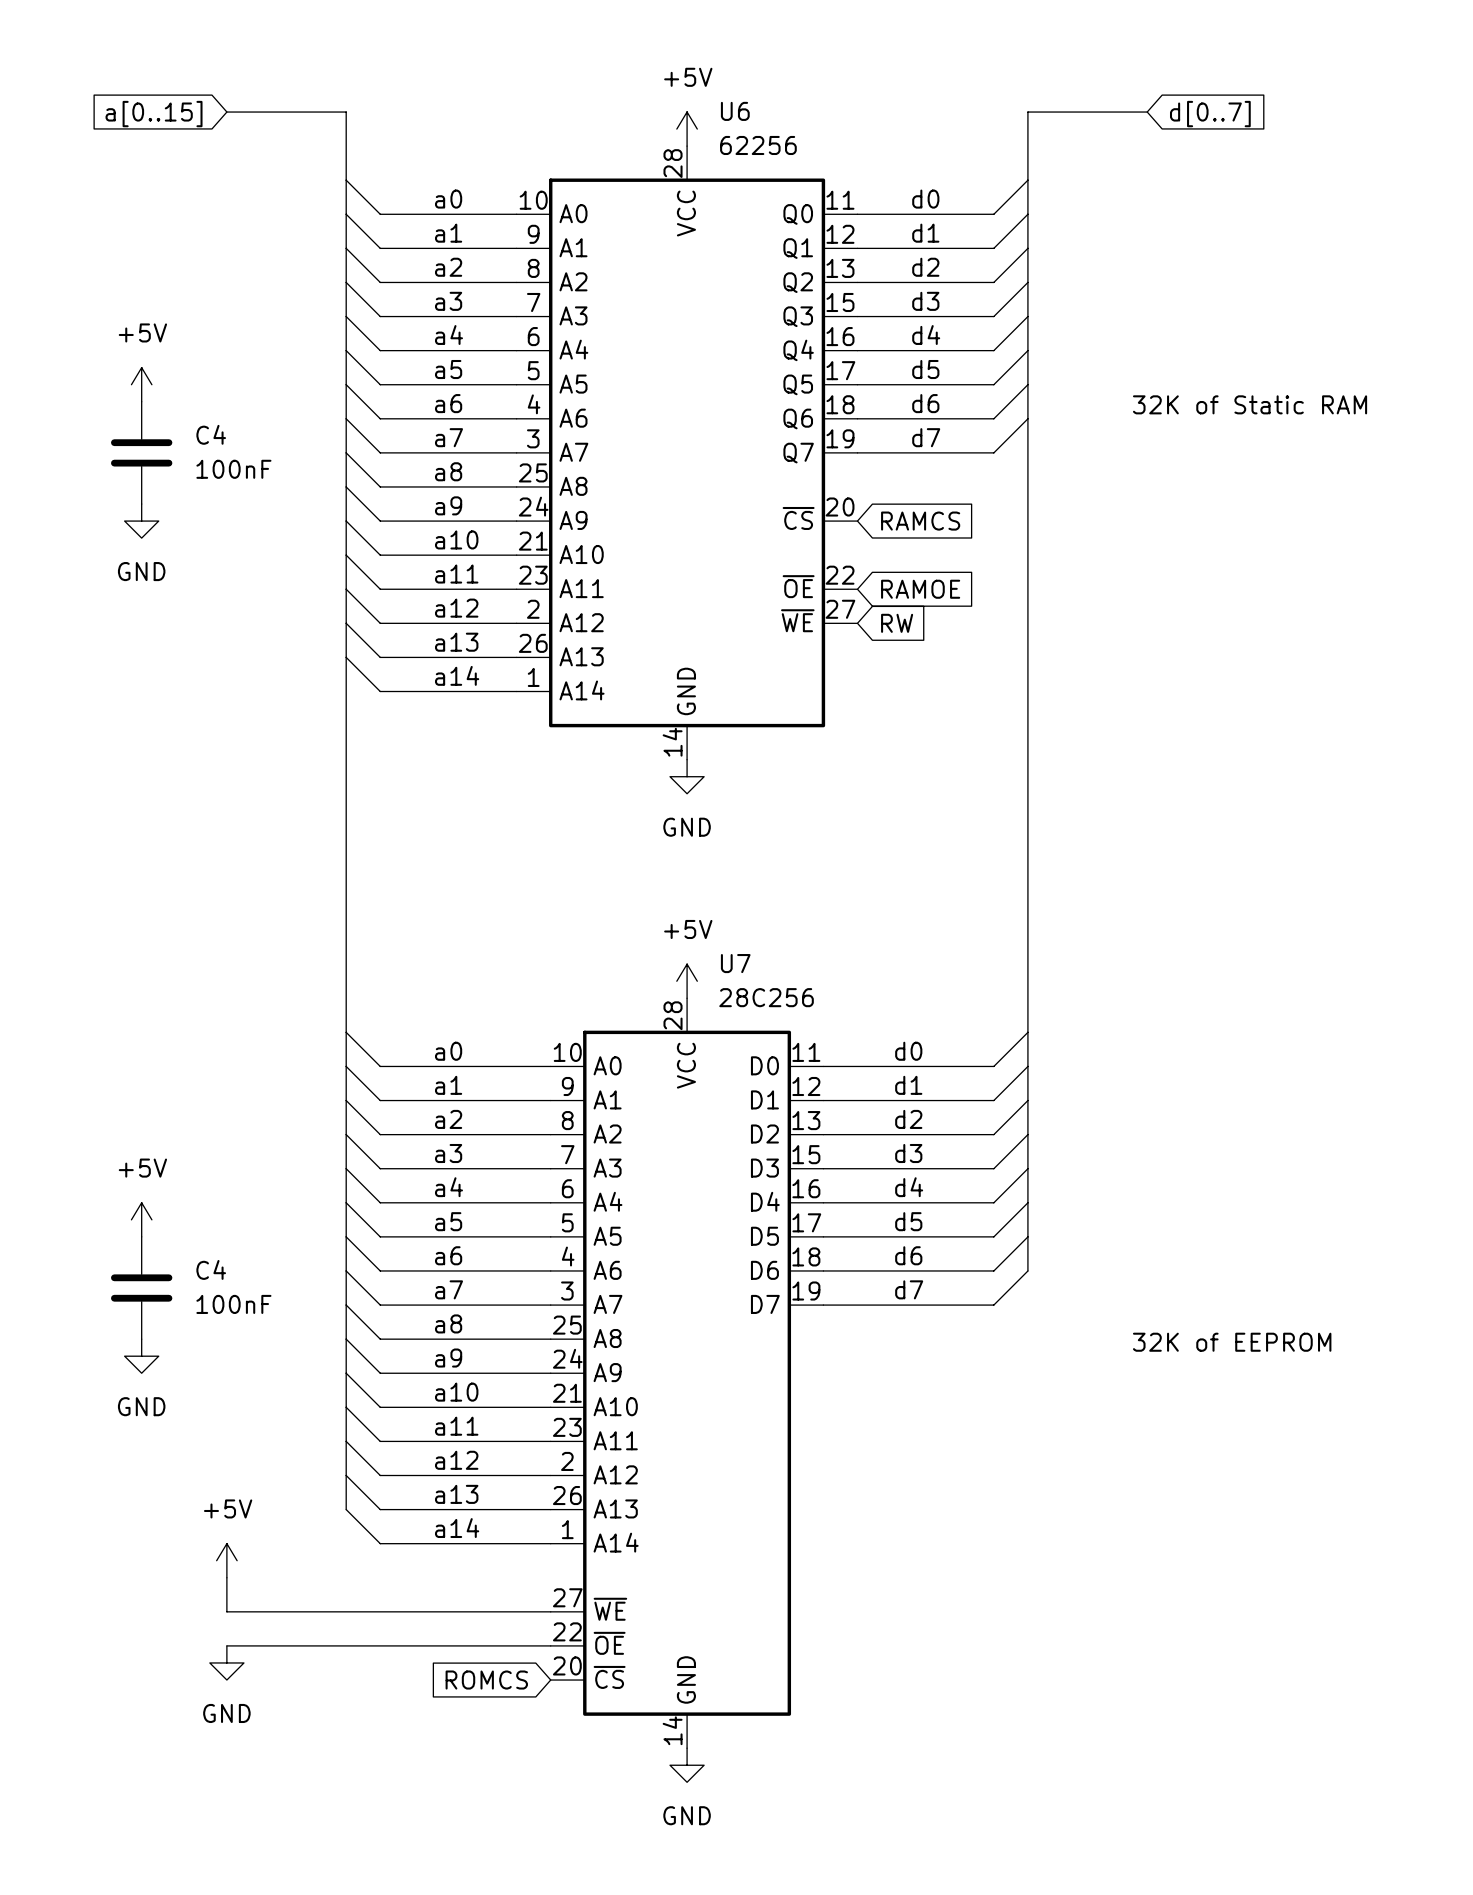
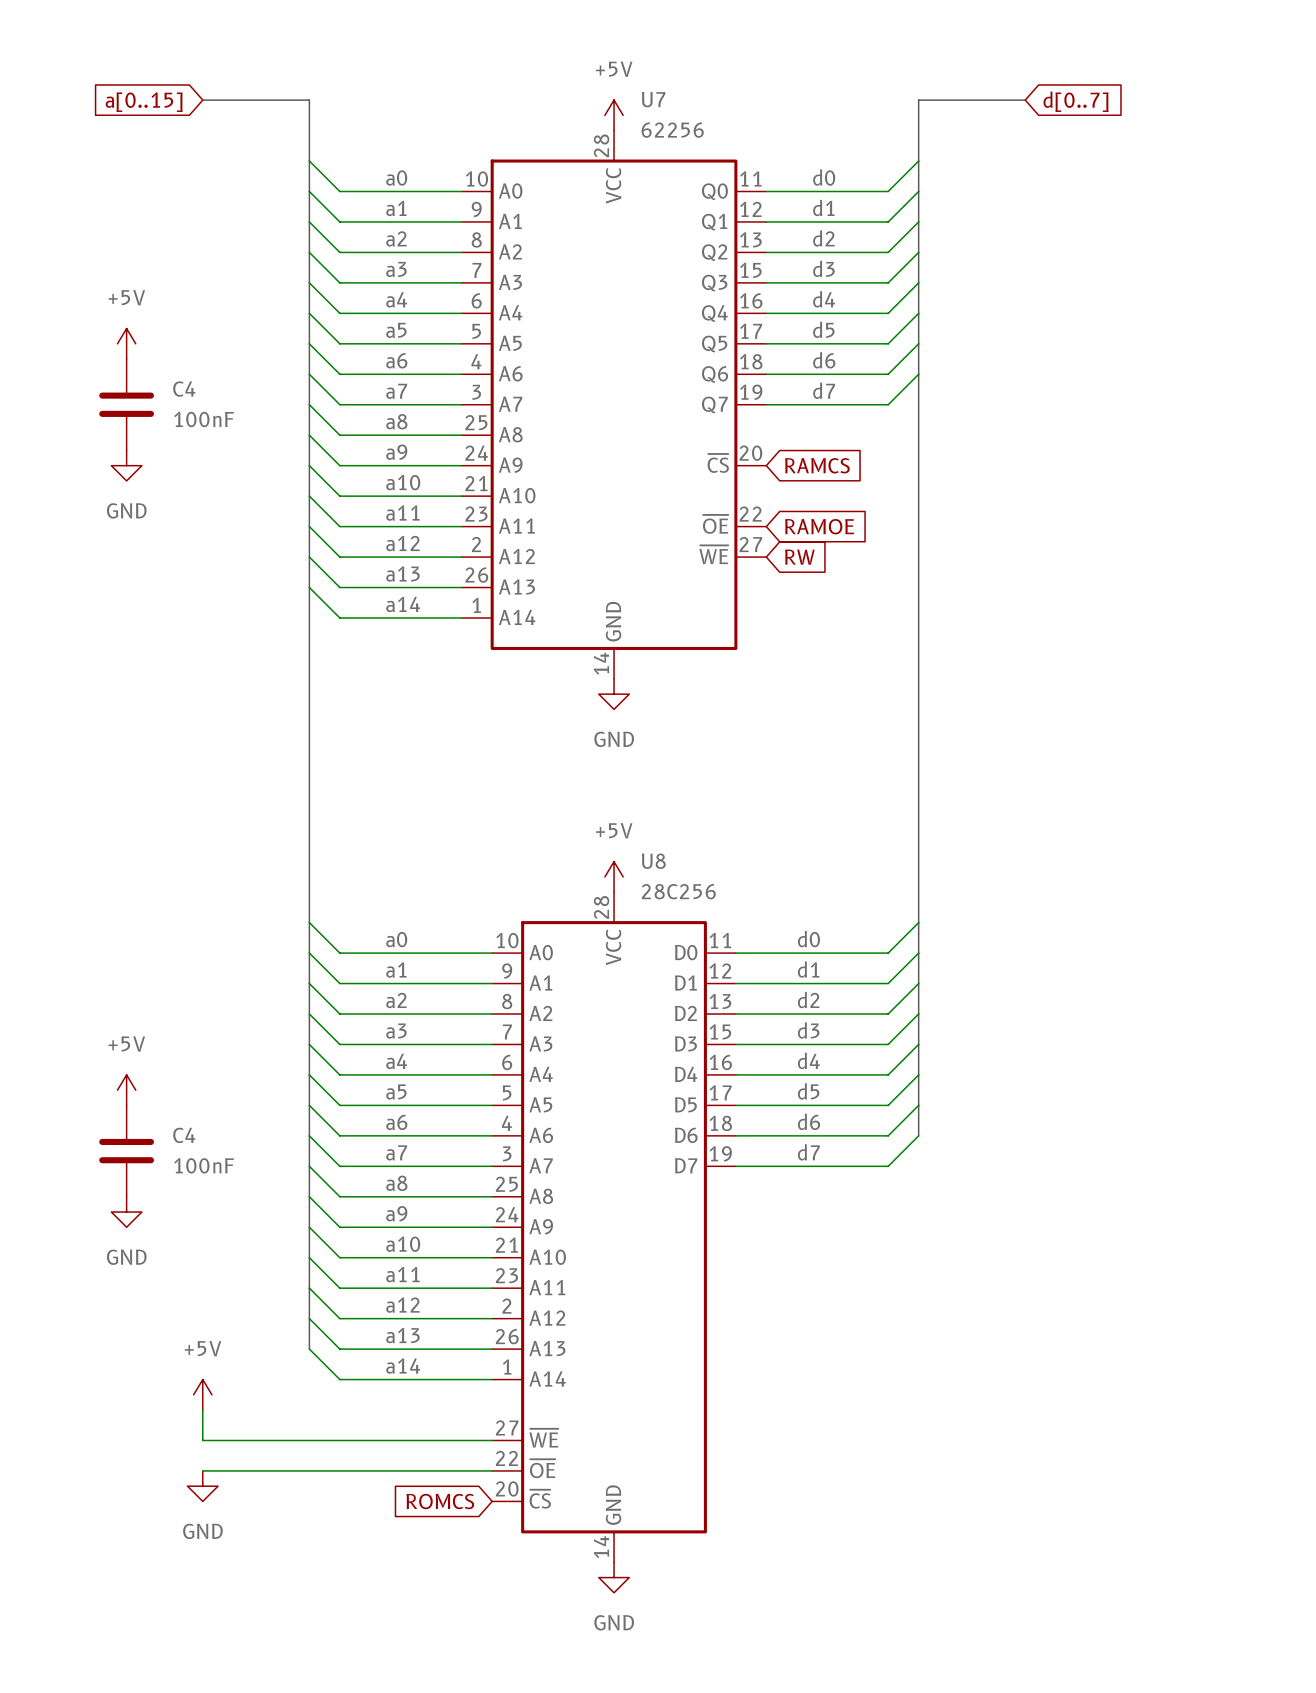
U6 name: U6 (735, 111) -> U7 (653, 99)
text: 32K of Static RAM (1250, 404) -> none
U7 name: U7 (735, 963) -> U8 (653, 861)
text: 32K of EEPROM (1232, 1342) -> none

